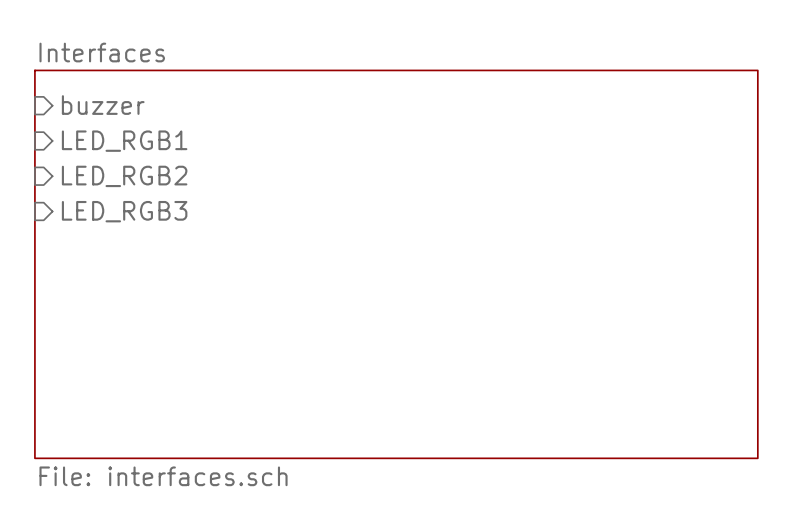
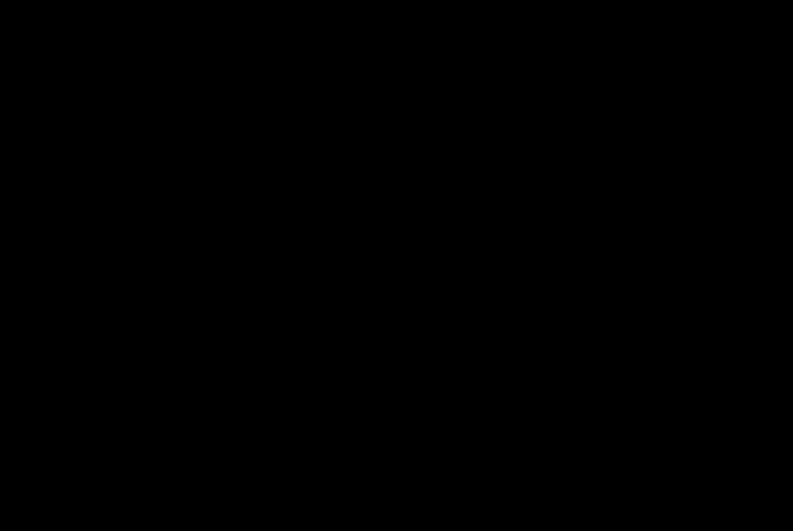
sheet pin: buzzer (103, 105) -> none
sheet pin: LED_RGB1 (124, 141) -> none
sheet pin: LED_RGB2 (124, 176) -> none
sheet pin: LED_RGB3 (124, 211) -> none
sheet Interfaces: File: interfaces.sch (396, 264) -> none

